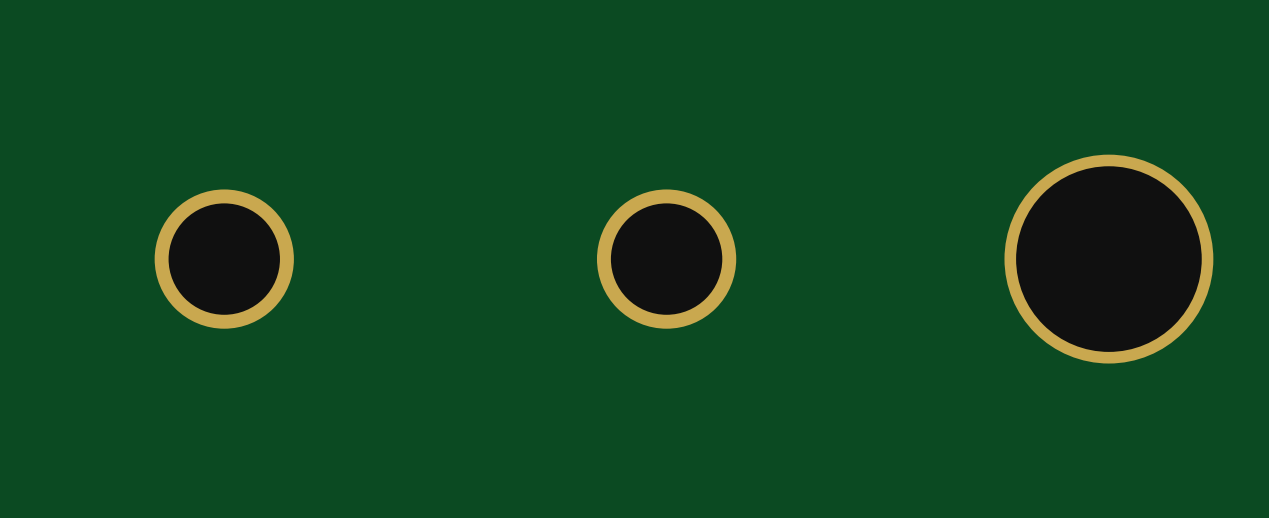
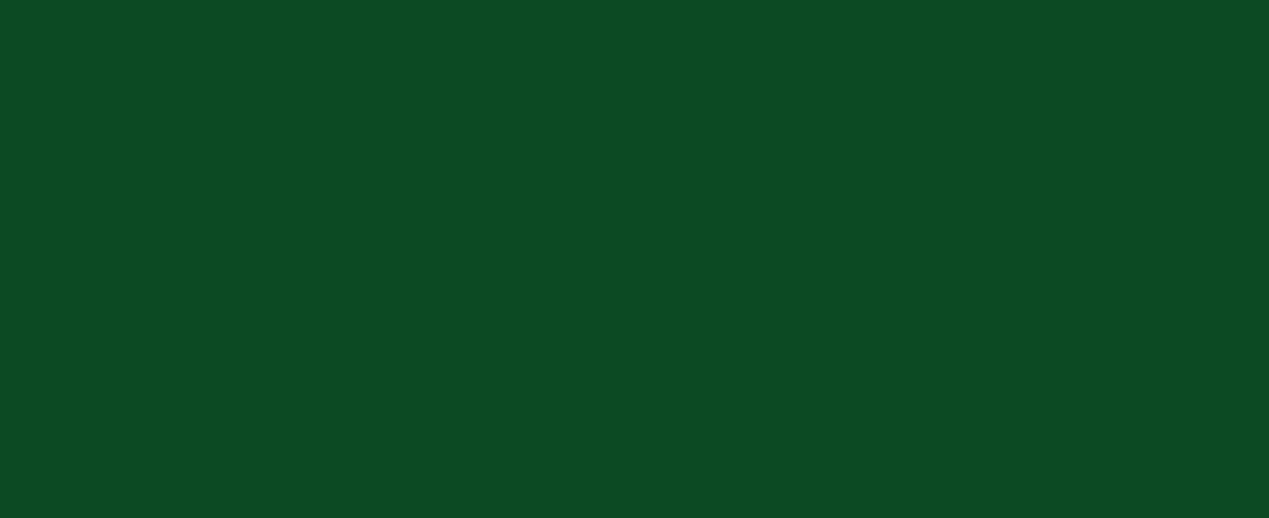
via: (224, 259) -> none
via: (666, 259) -> none
via: (1108, 259) -> none

